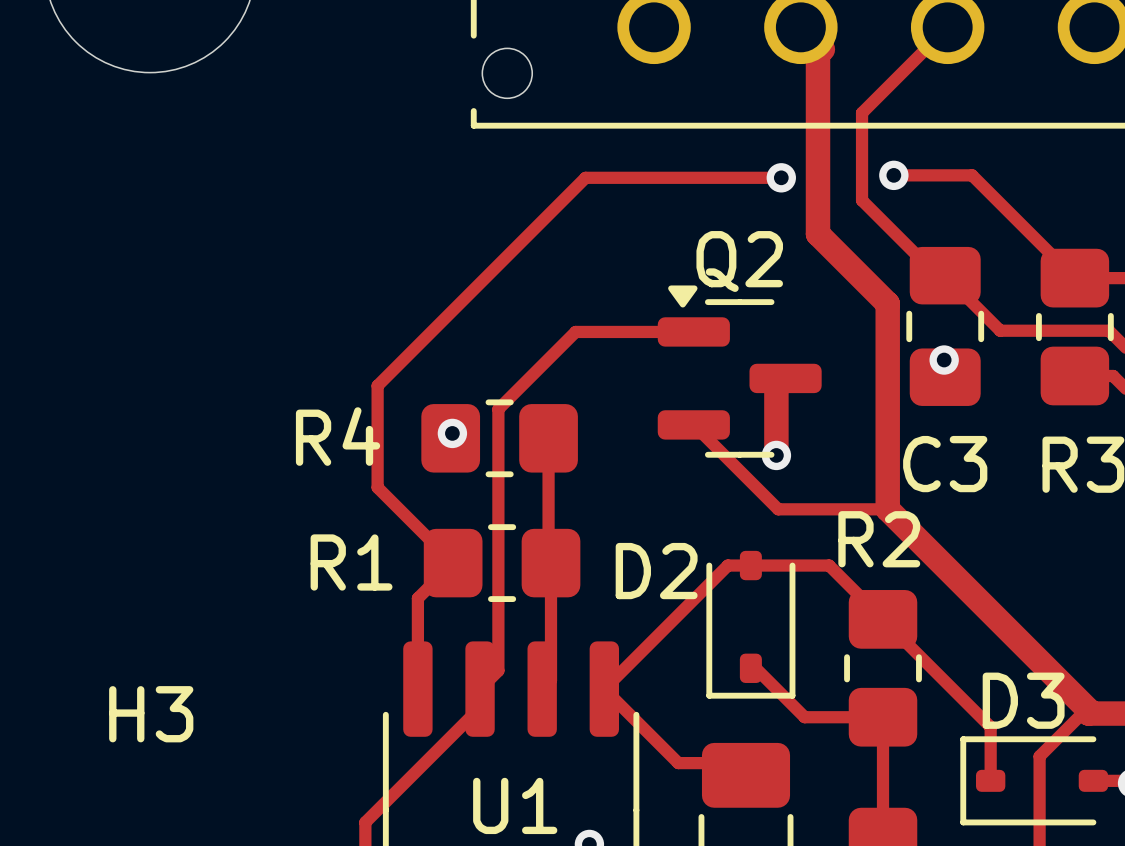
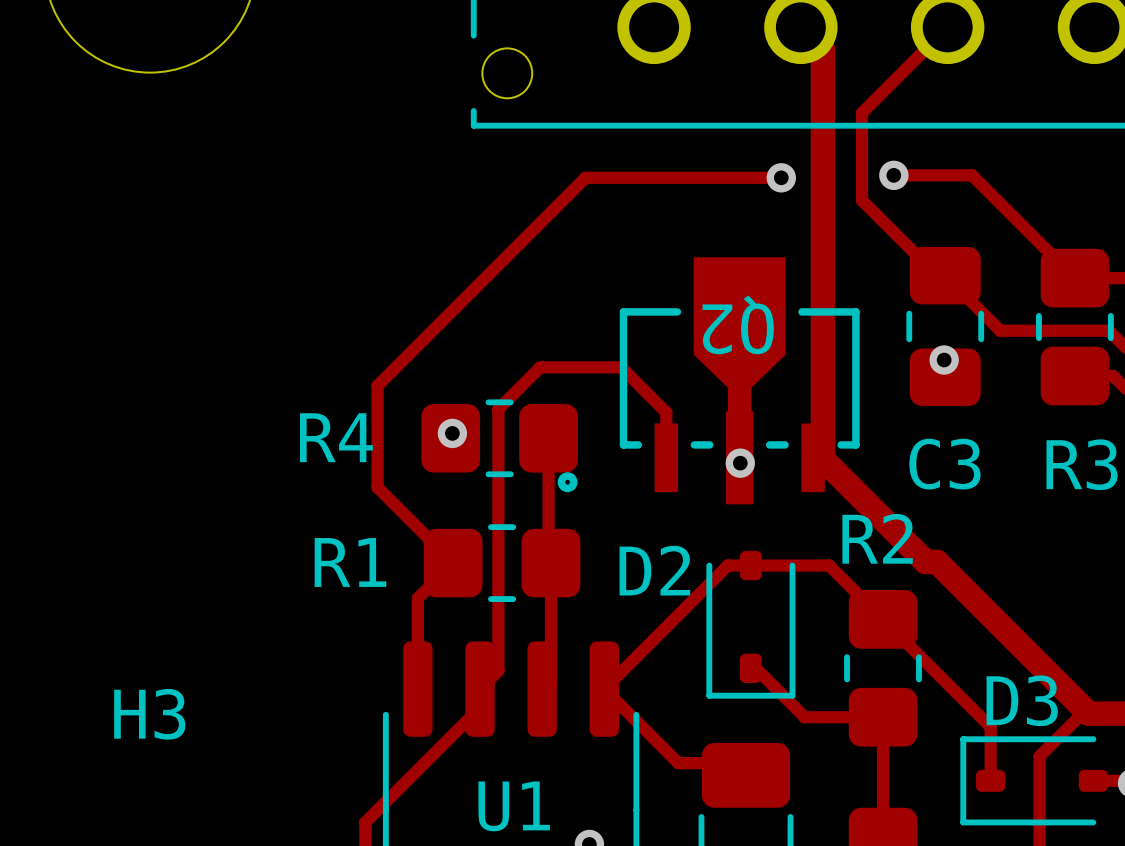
track: (818, 44) (818, 234) (887, 303) (887, 509) -> none
Q2 footprint: [657, 285, 822, 458] -> [557, 257, 860, 505]
track: (693, 331) (575, 331) (540, 367) -> (666, 457) (666, 412) (621, 367) (540, 367)
track: (785, 378) (776, 387) (776, 455) -> none
track: (693, 424) (778, 509) (887, 509) -> none
via position: (776, 455) -> (740, 463)
track: (887, 509) (1088, 710) (1088, 713) -> (822, 49) (822, 459) (925, 561) (937, 561) (1088, 713)

